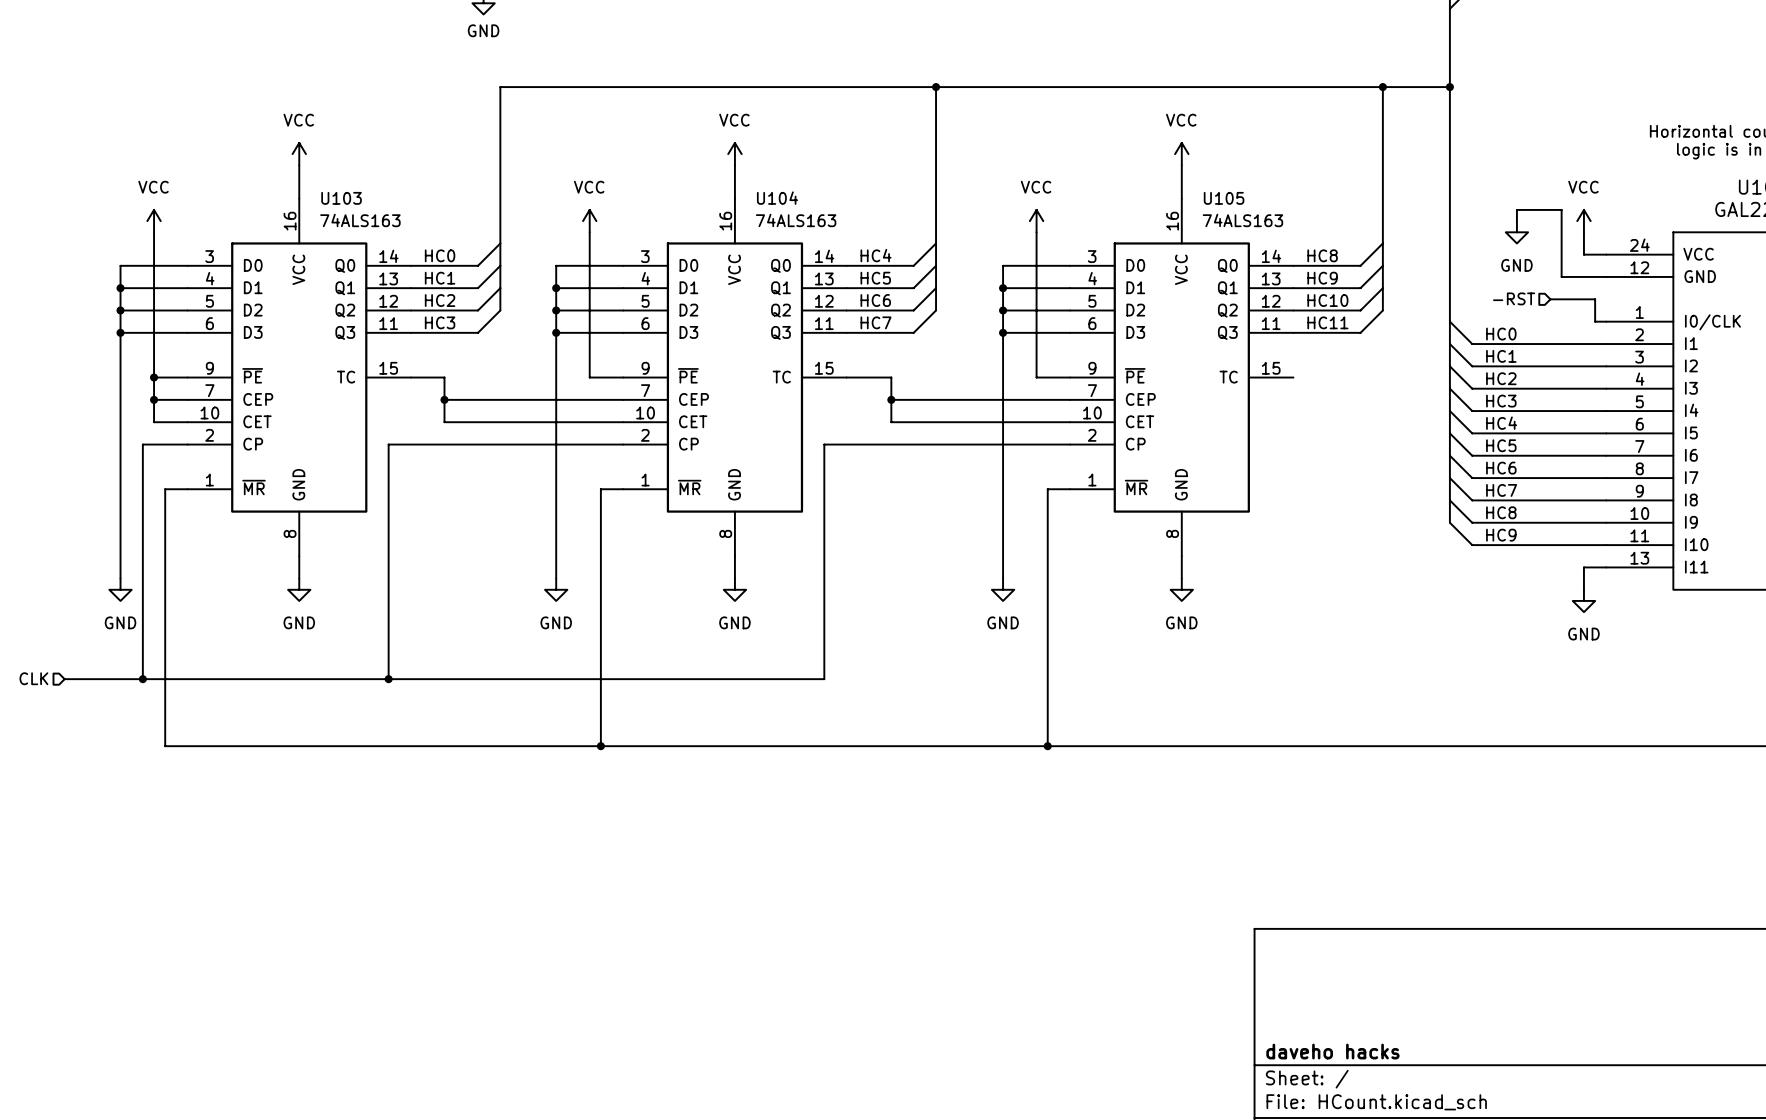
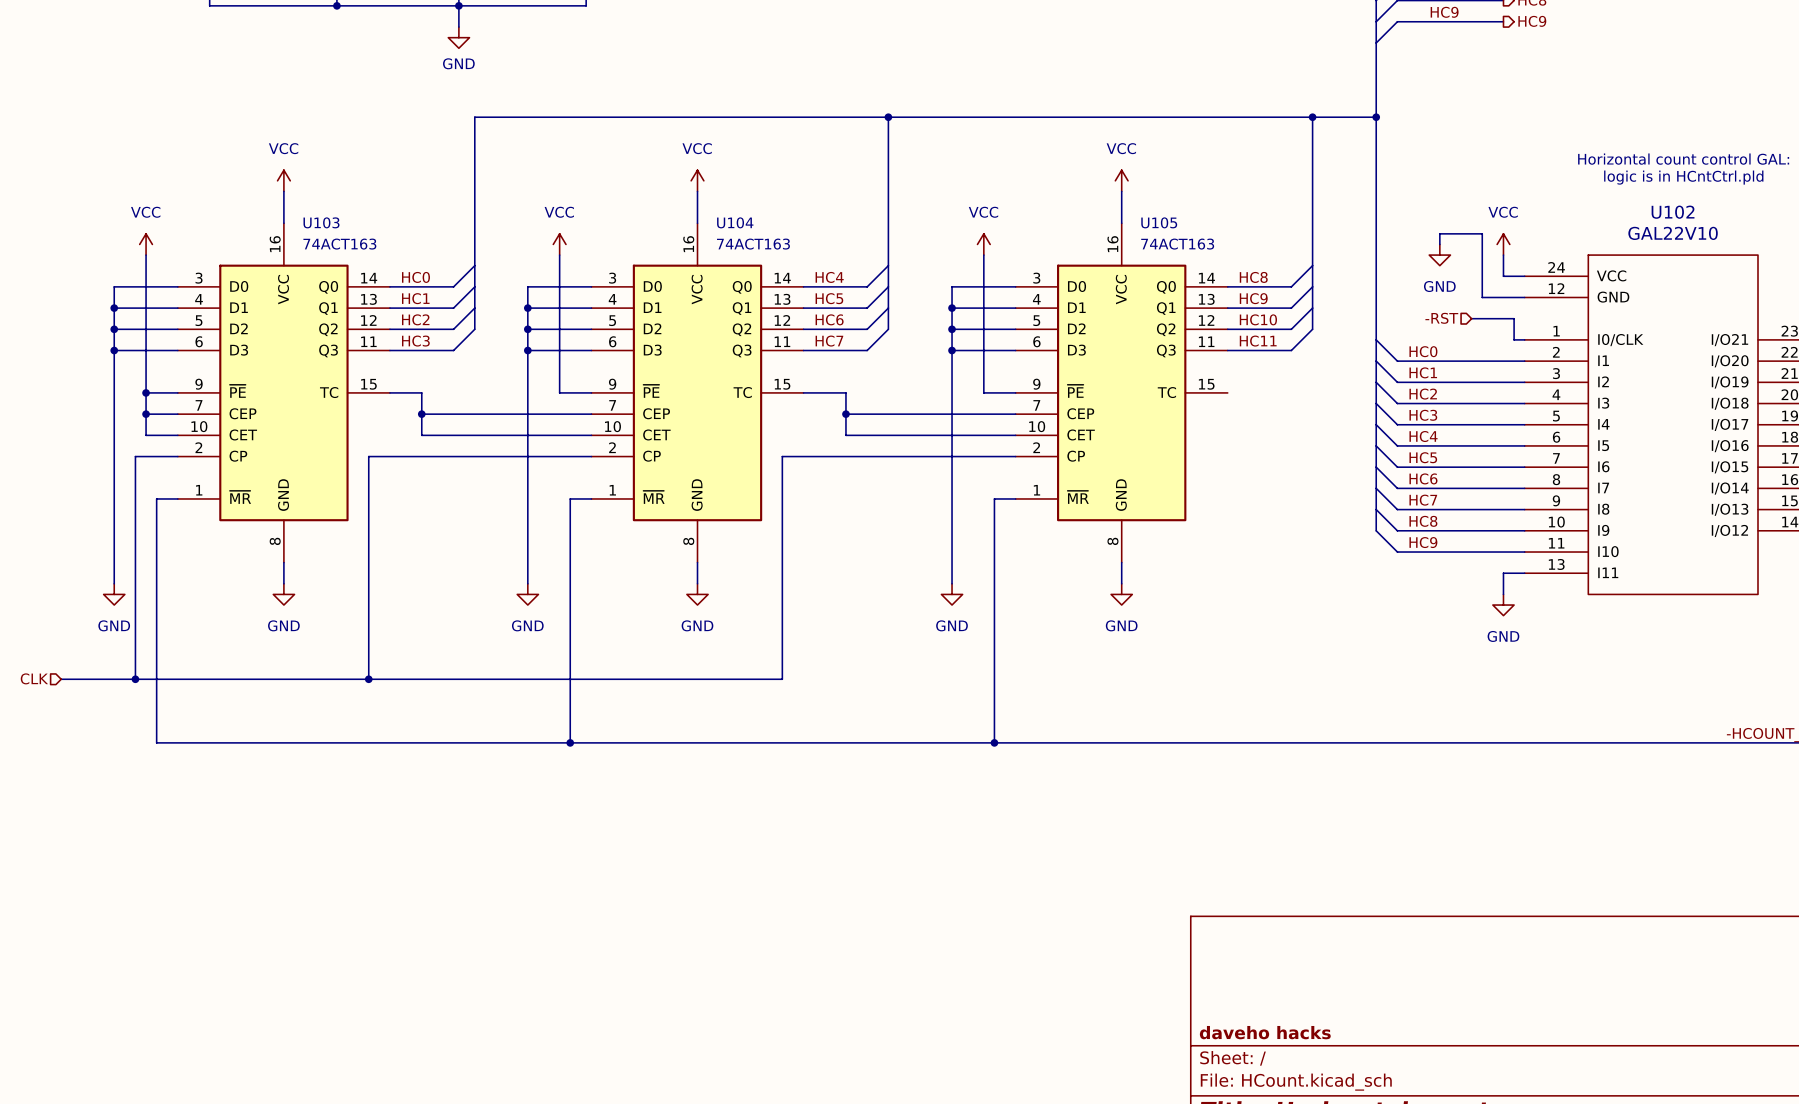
U103 value: 74ALS163 (360, 220) -> 74ACT163 (339, 244)
U104 value: 74ALS163 (796, 220) -> 74ACT163 (753, 244)
U105 value: 74ALS163 (1242, 220) -> 74ACT163 (1177, 244)

